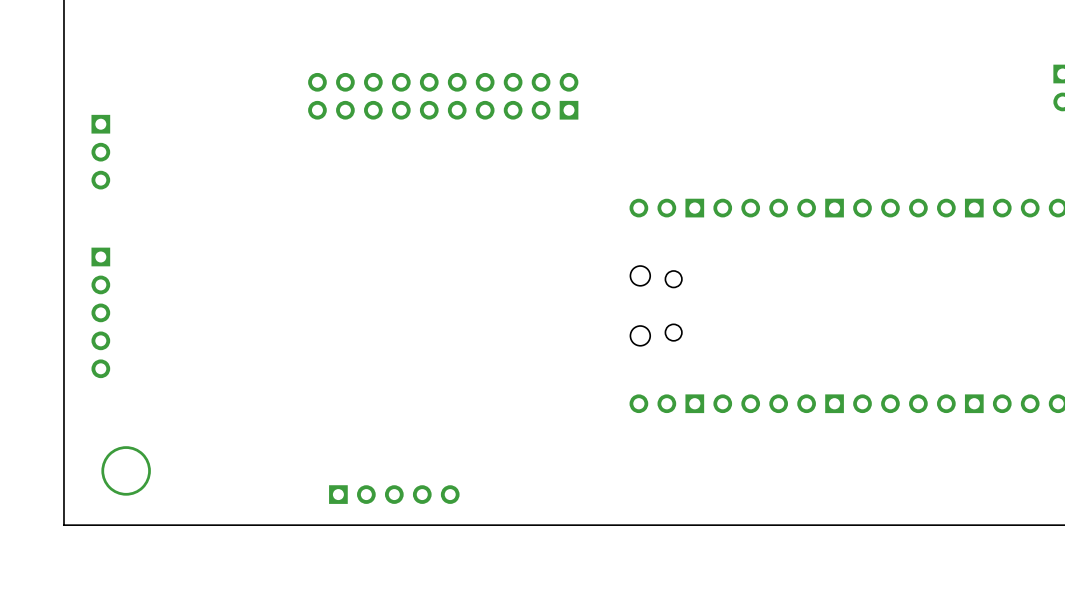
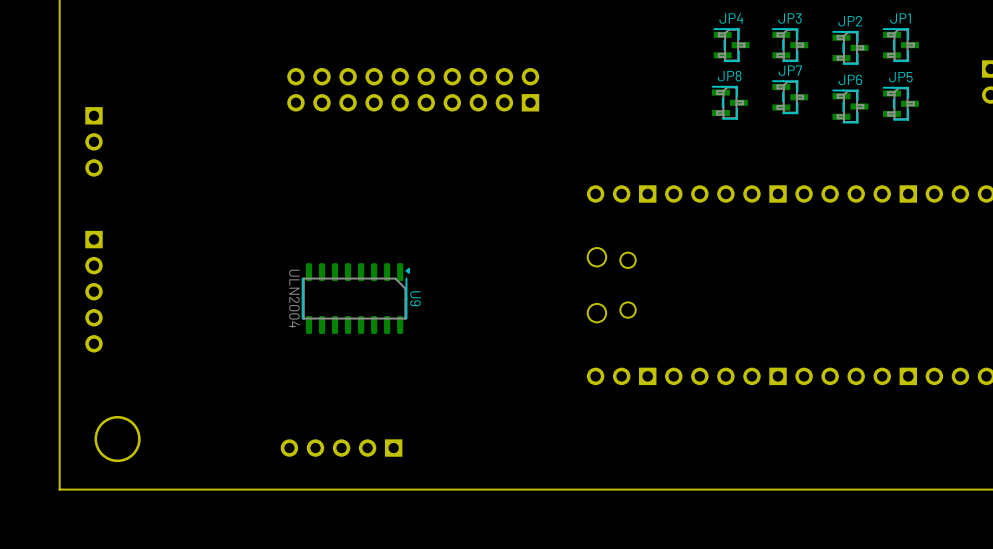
JP4: none -> (731, 45)
JP3: none -> (790, 45)
JP1: none -> (901, 45)
JP2: none -> (850, 47)
JP7: none -> (790, 97)
JP8: none -> (729, 102)
JP5: none -> (901, 103)
JP6: none -> (850, 106)
U9: none -> ULN2004 (355, 298)
part rotation: 0° (394, 494) -> 180° (341, 448)

